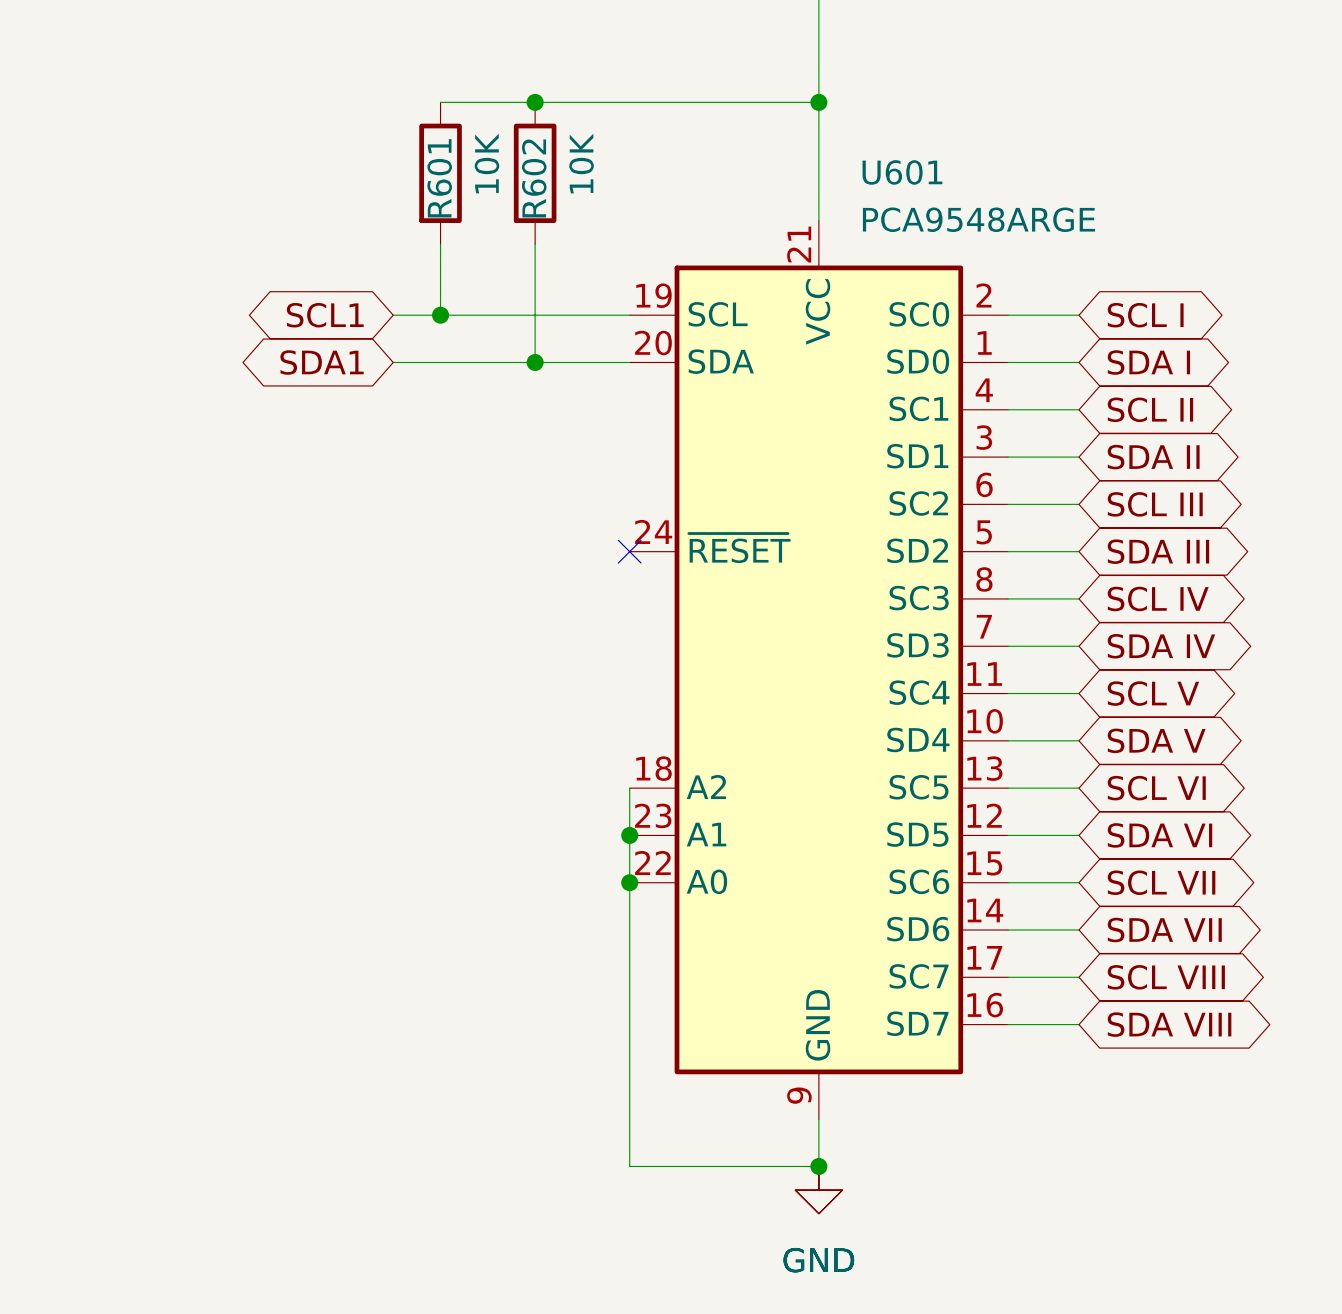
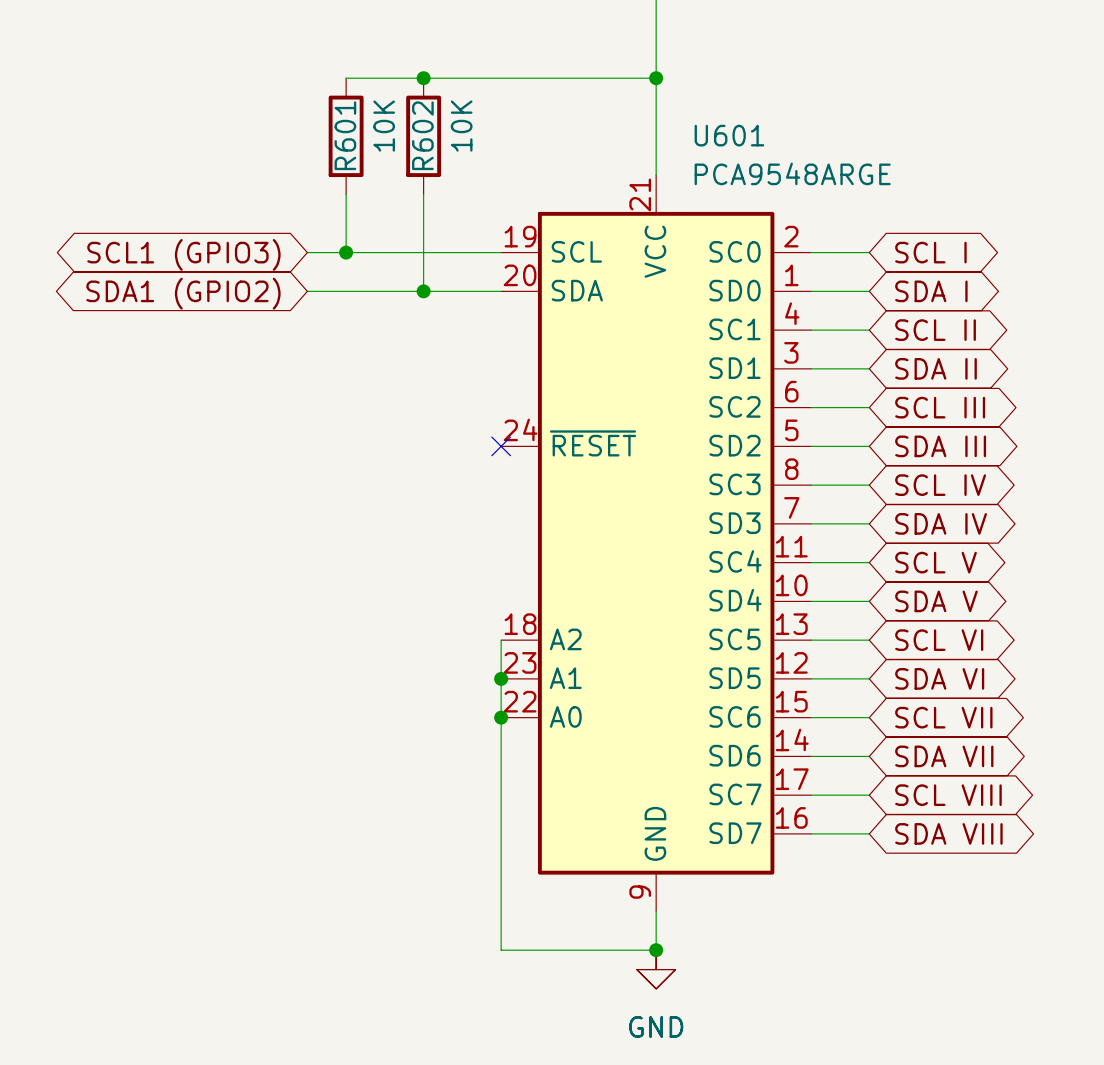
global label: SCL1 (325, 315) -> SCL1 (GPIO3) (183, 254)
global label: SDA1 (322, 362) -> SDA1 (GPIO2) (183, 293)

